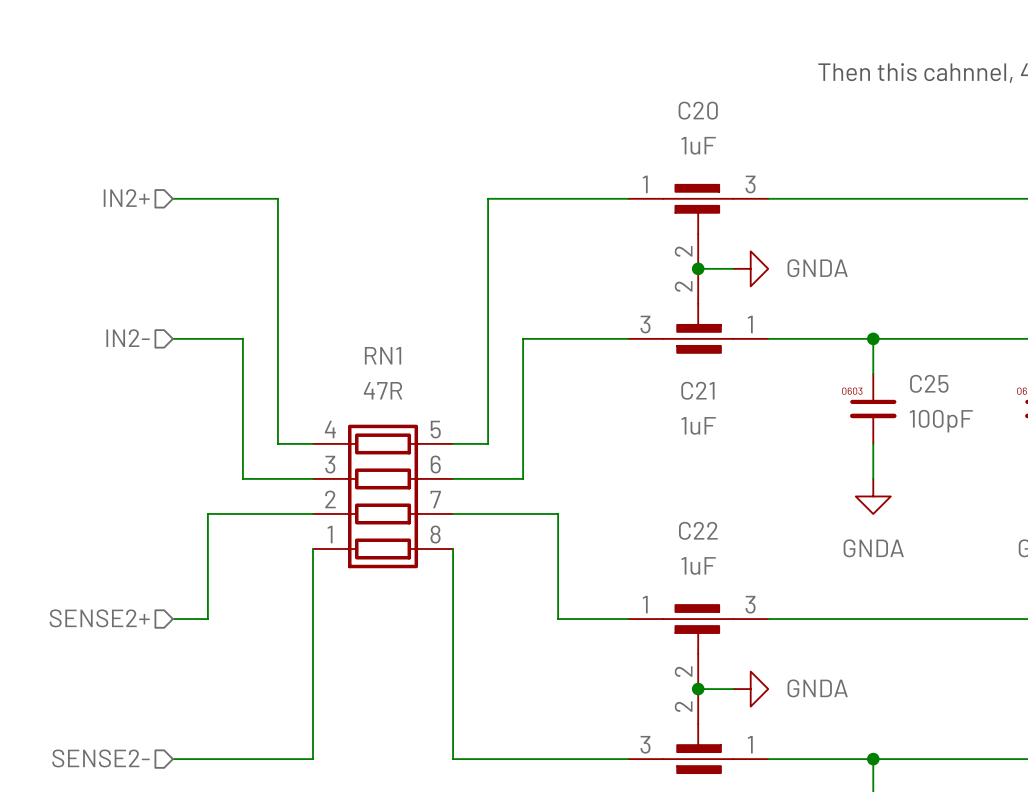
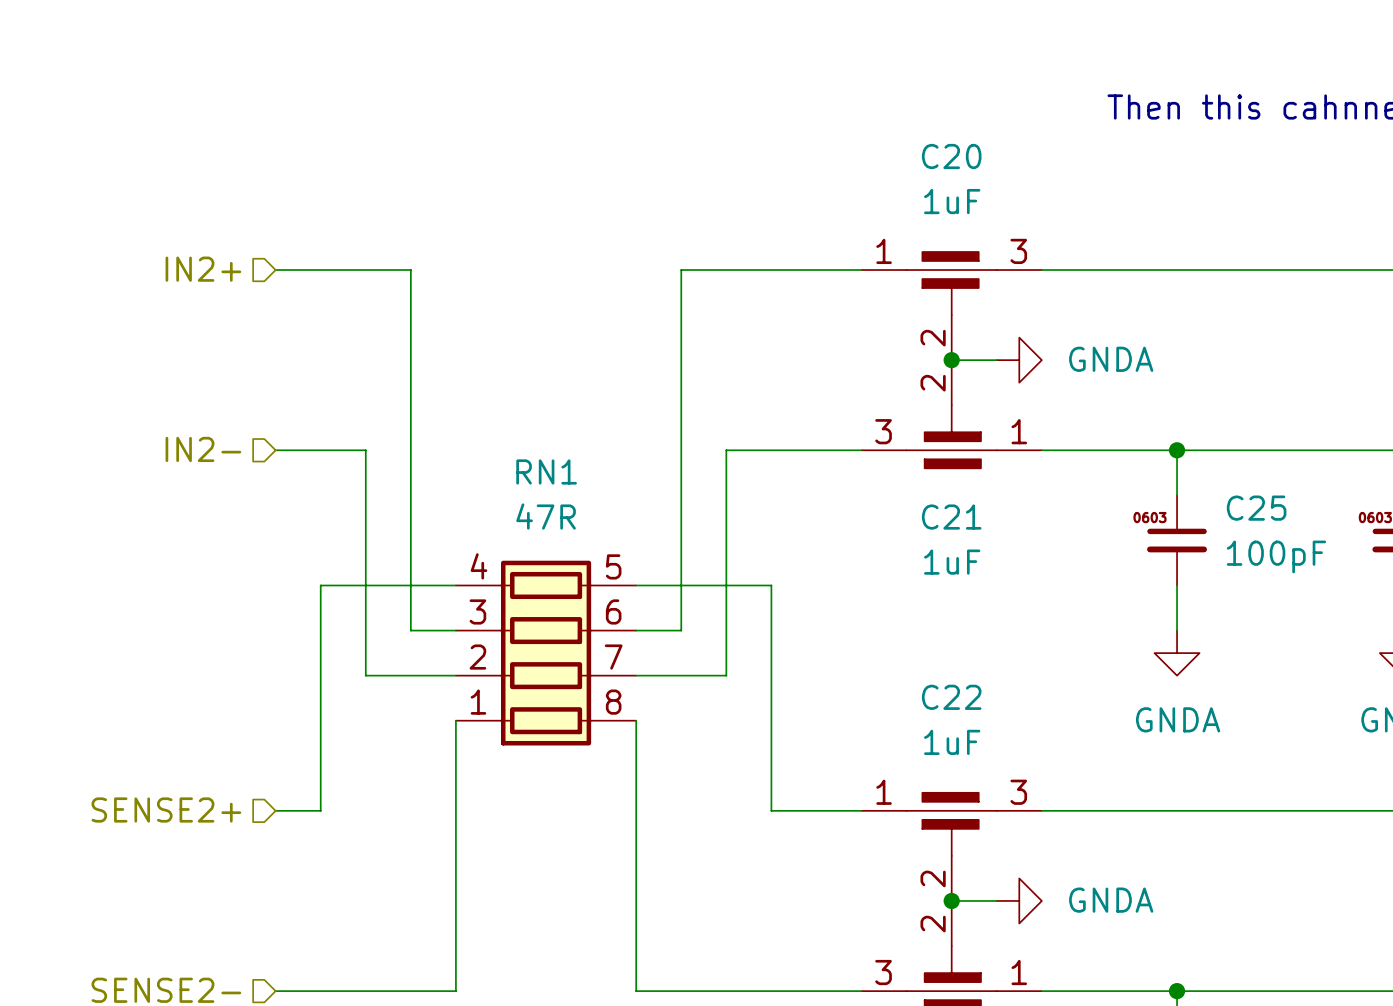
wire: (242, 478) (277, 478) -> (320, 675) (320, 585) (410, 585) (410, 630)
wire: (488, 478) (523, 478) -> (681, 630) (681, 585) (771, 585) (771, 675)
wire: (207, 513) (242, 513) -> (365, 630) (365, 675)
wire: (523, 513) (558, 513) -> (726, 675) (726, 630)

